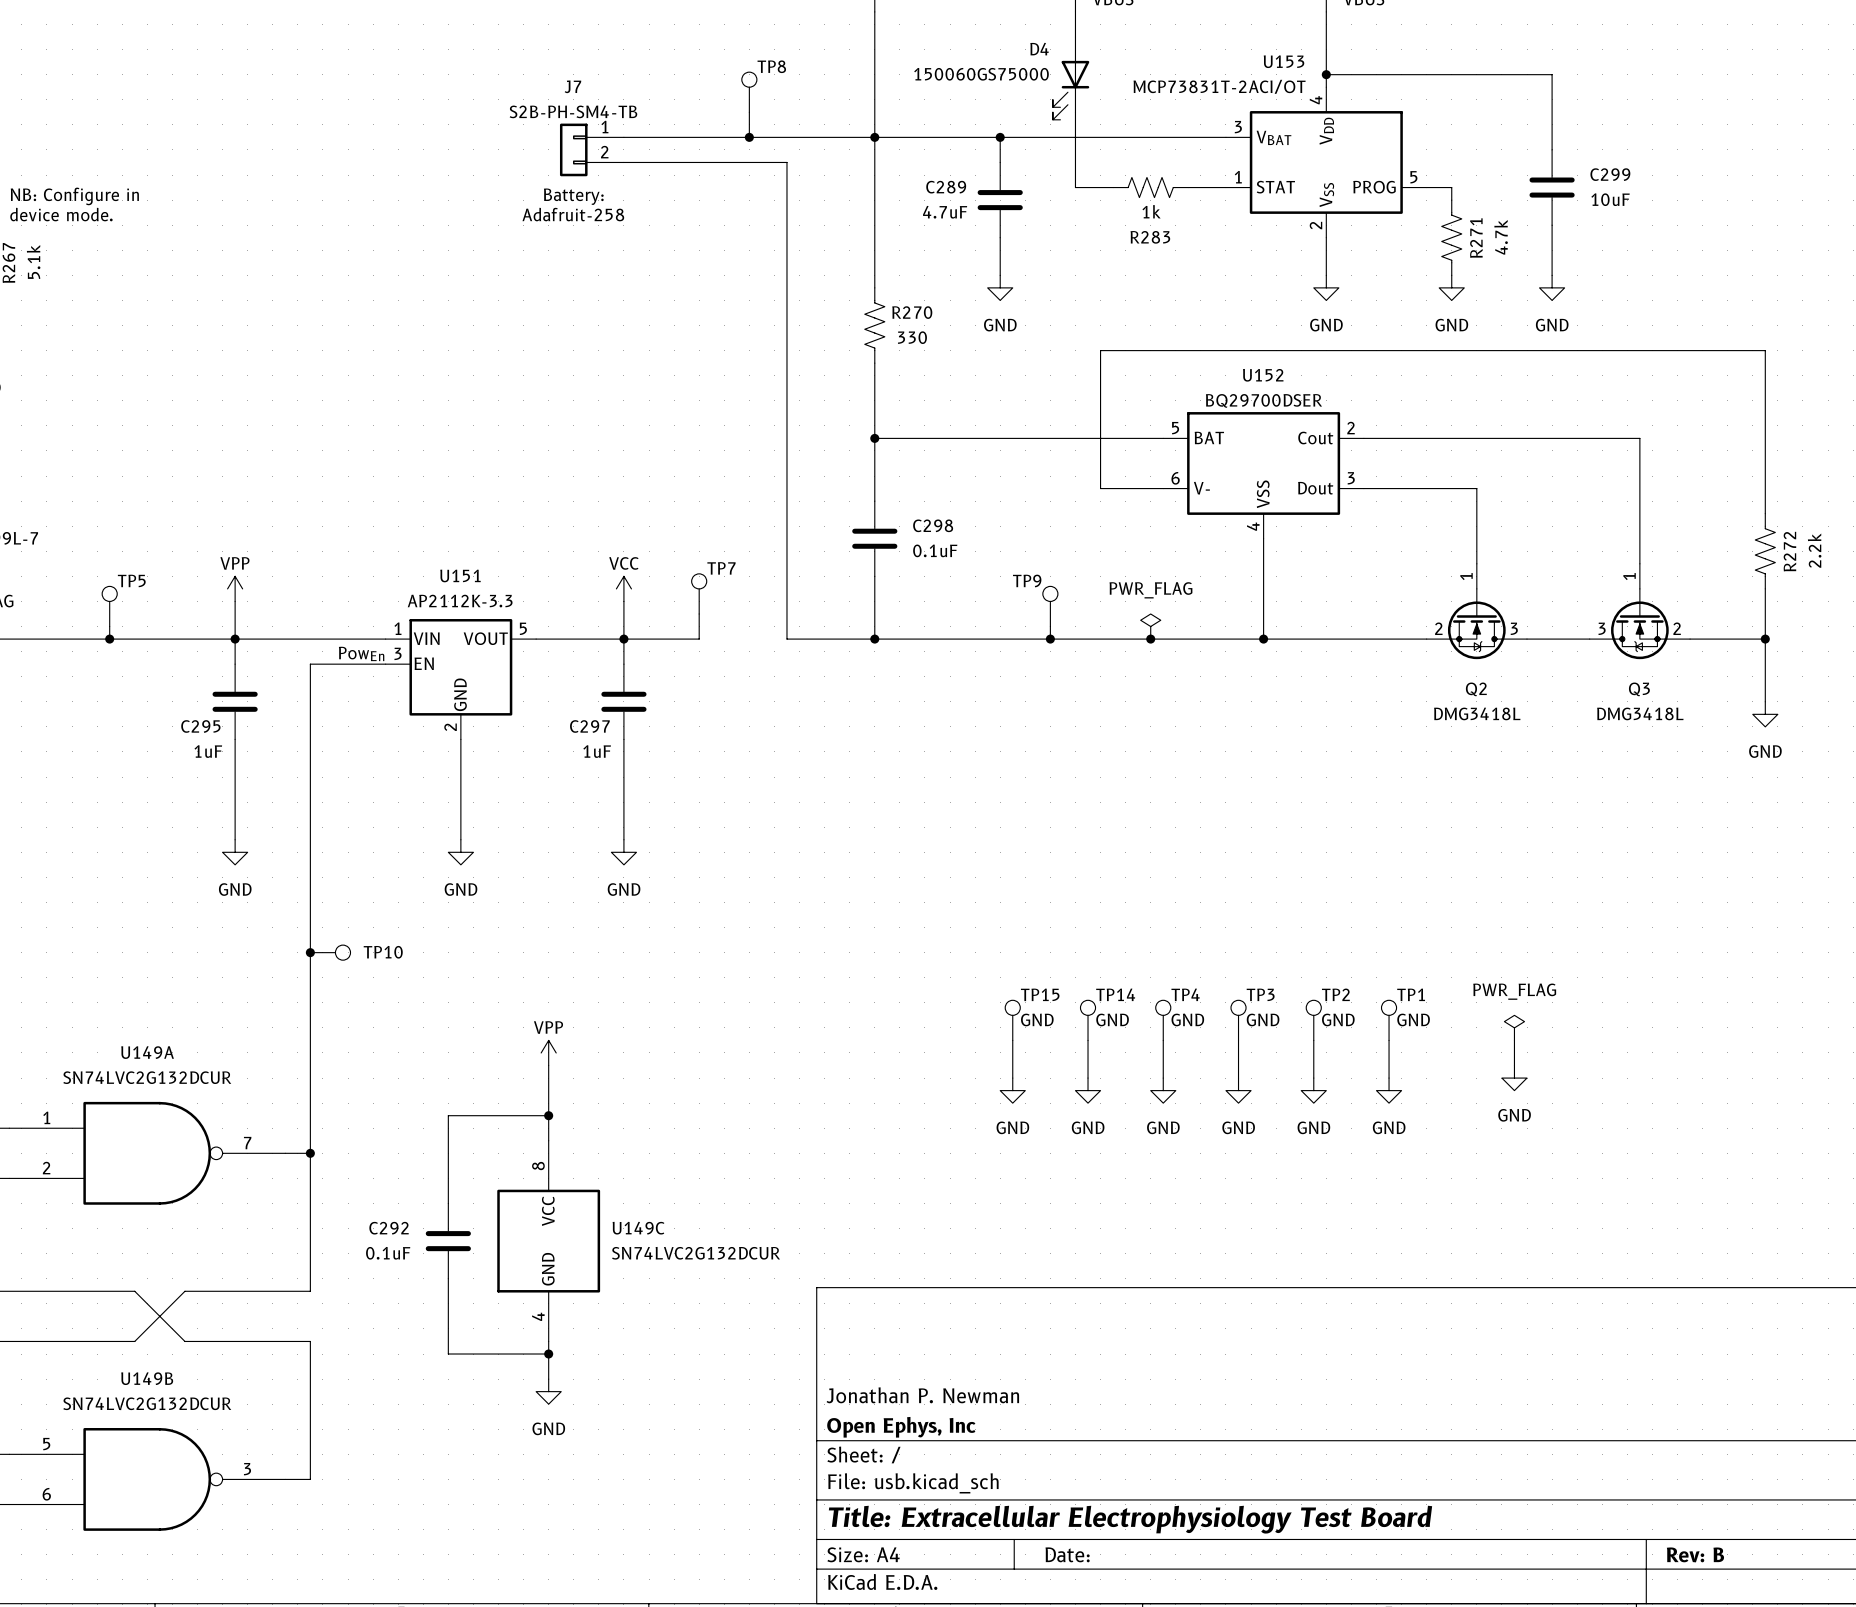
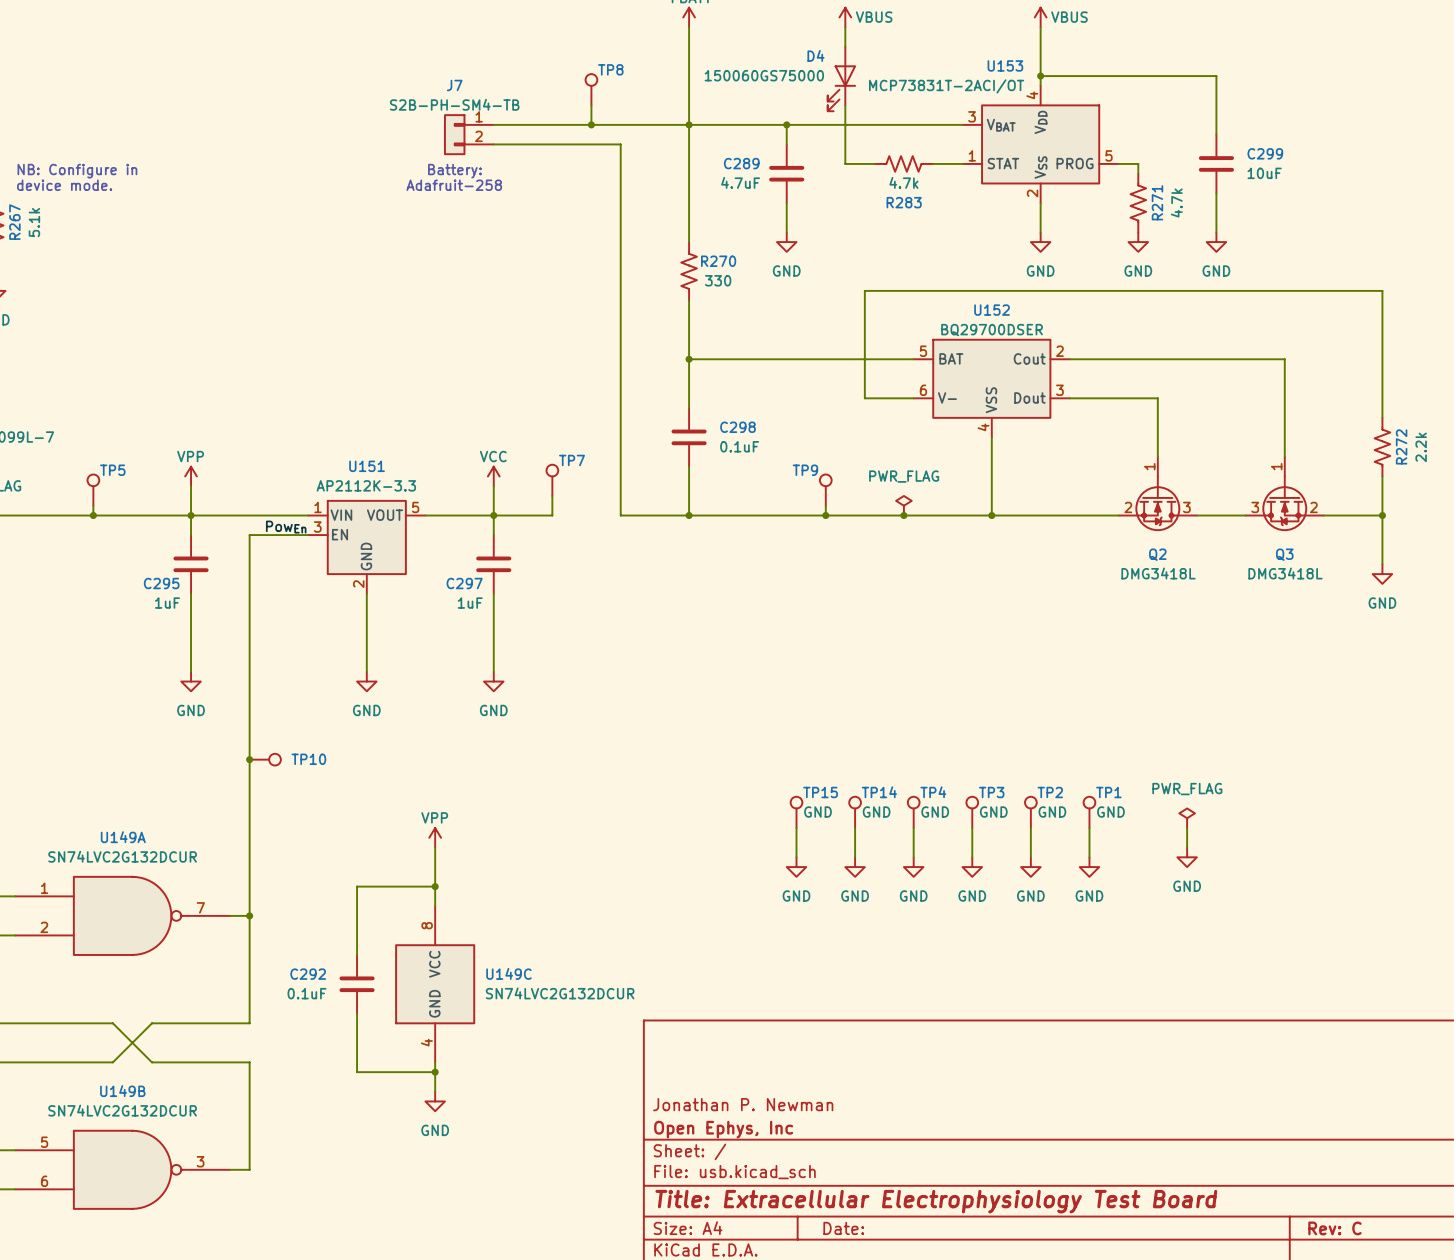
R283 value: 1k (1151, 211) -> 4.7k (903, 182)
title block: Rev: B (1695, 1554) -> Rev: C (1334, 1228)

